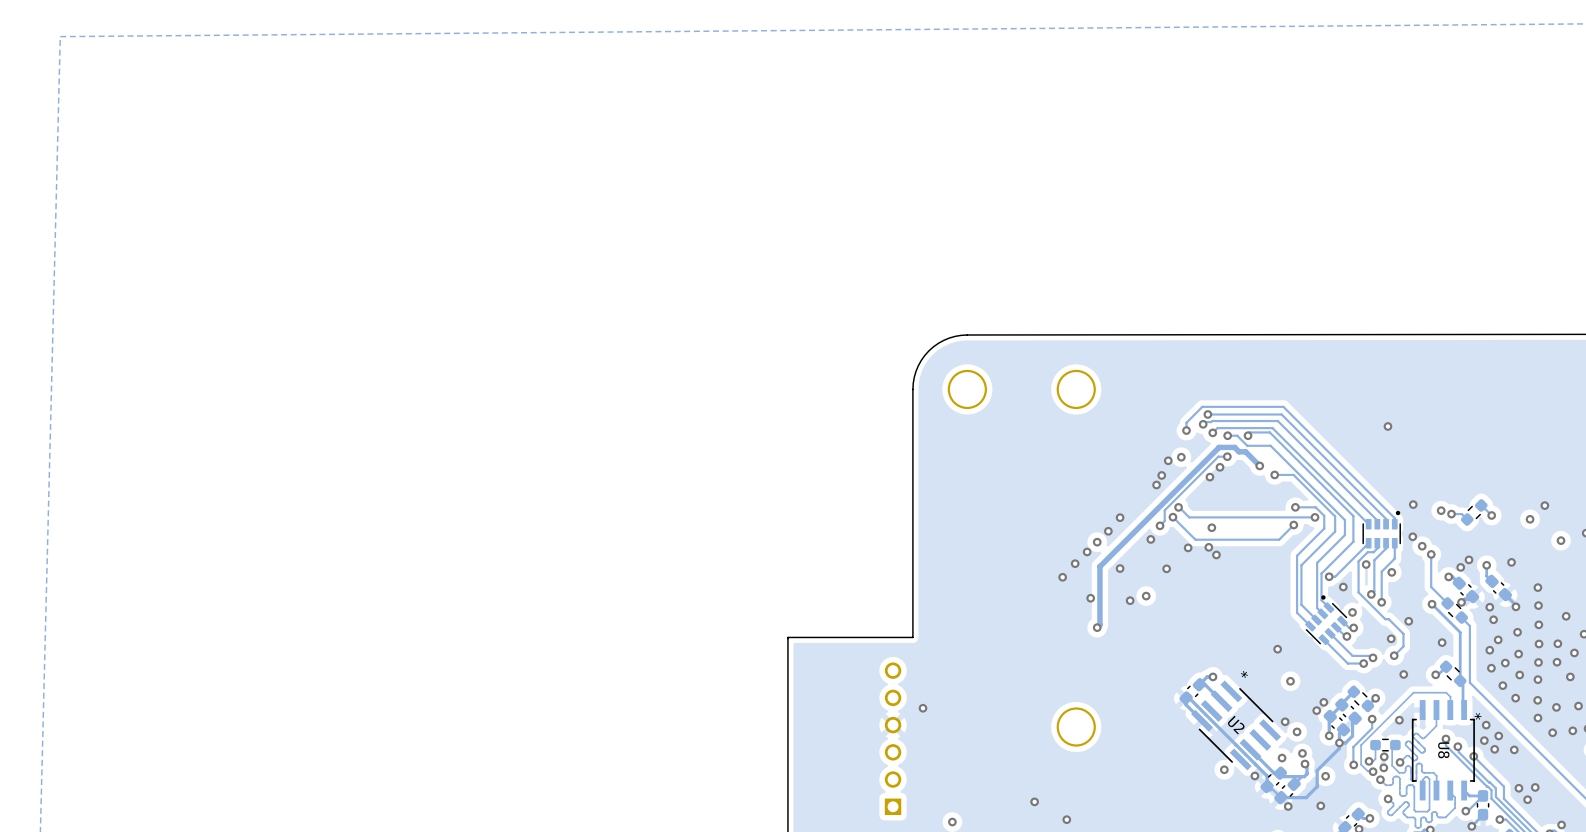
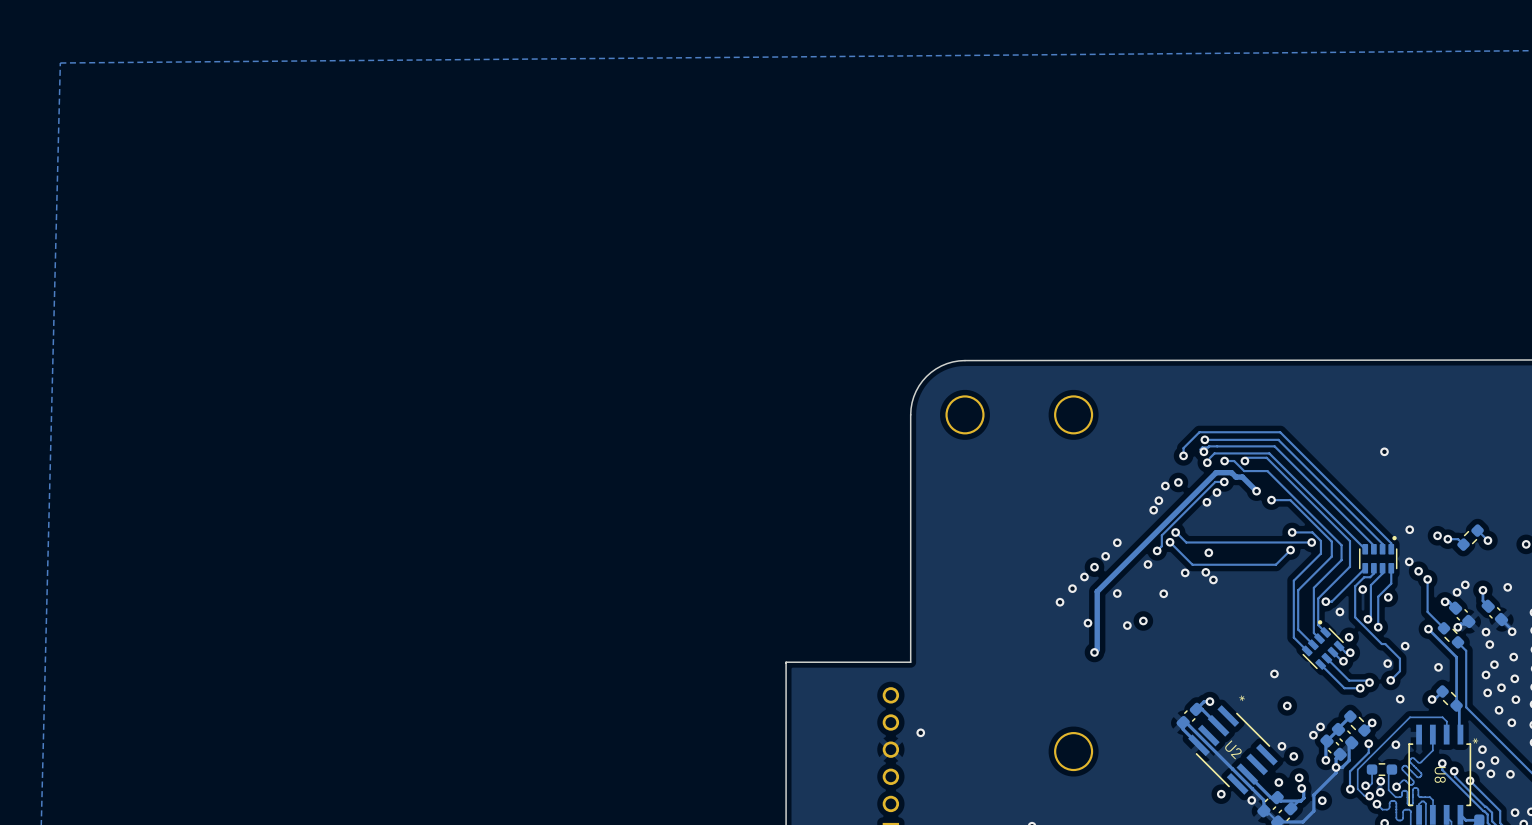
via: (1203, 424) -> none
via: none -> (1203, 451)
via: (1212, 432) -> none
via: none -> (1207, 462)

